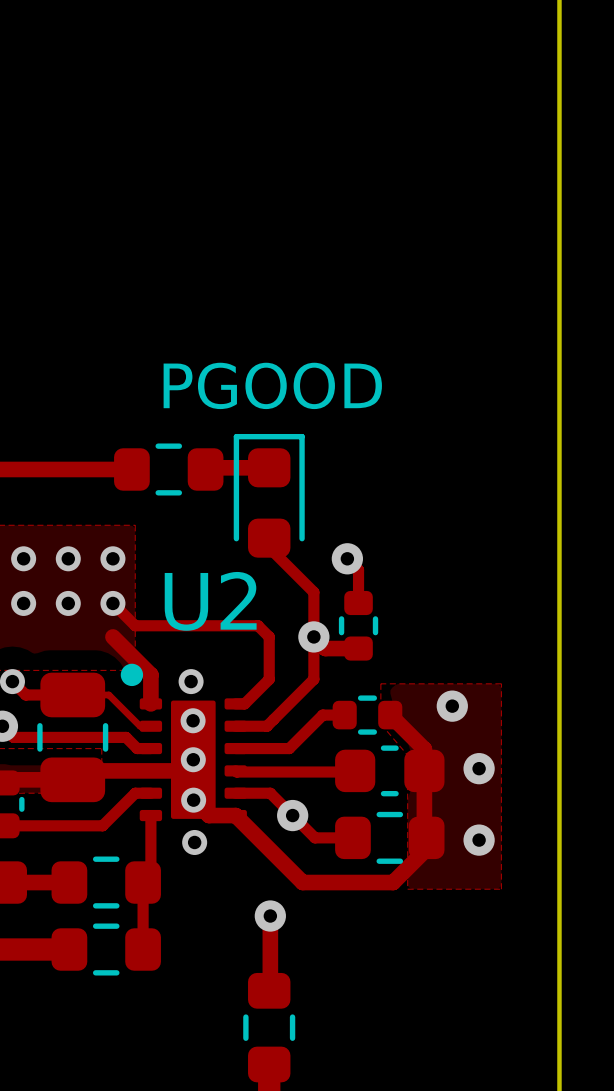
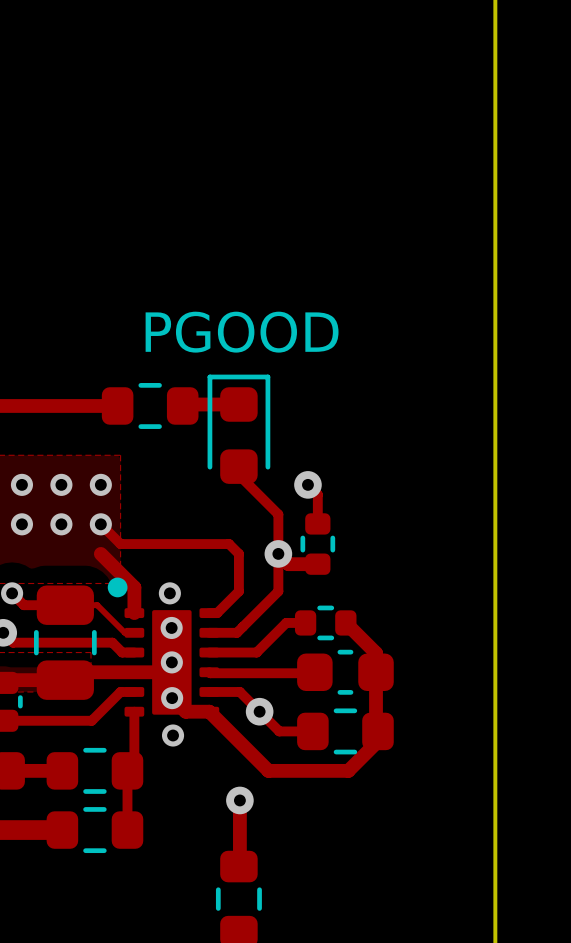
U2 name: U2 (210, 601) -> none
zone outline: (380, 683) (380, 724) (407, 755) (407, 889) (501, 889) (501, 683) (380, 683) -> none
via: (452, 706) -> none
via: (479, 768) -> none
via: (479, 840) -> none

